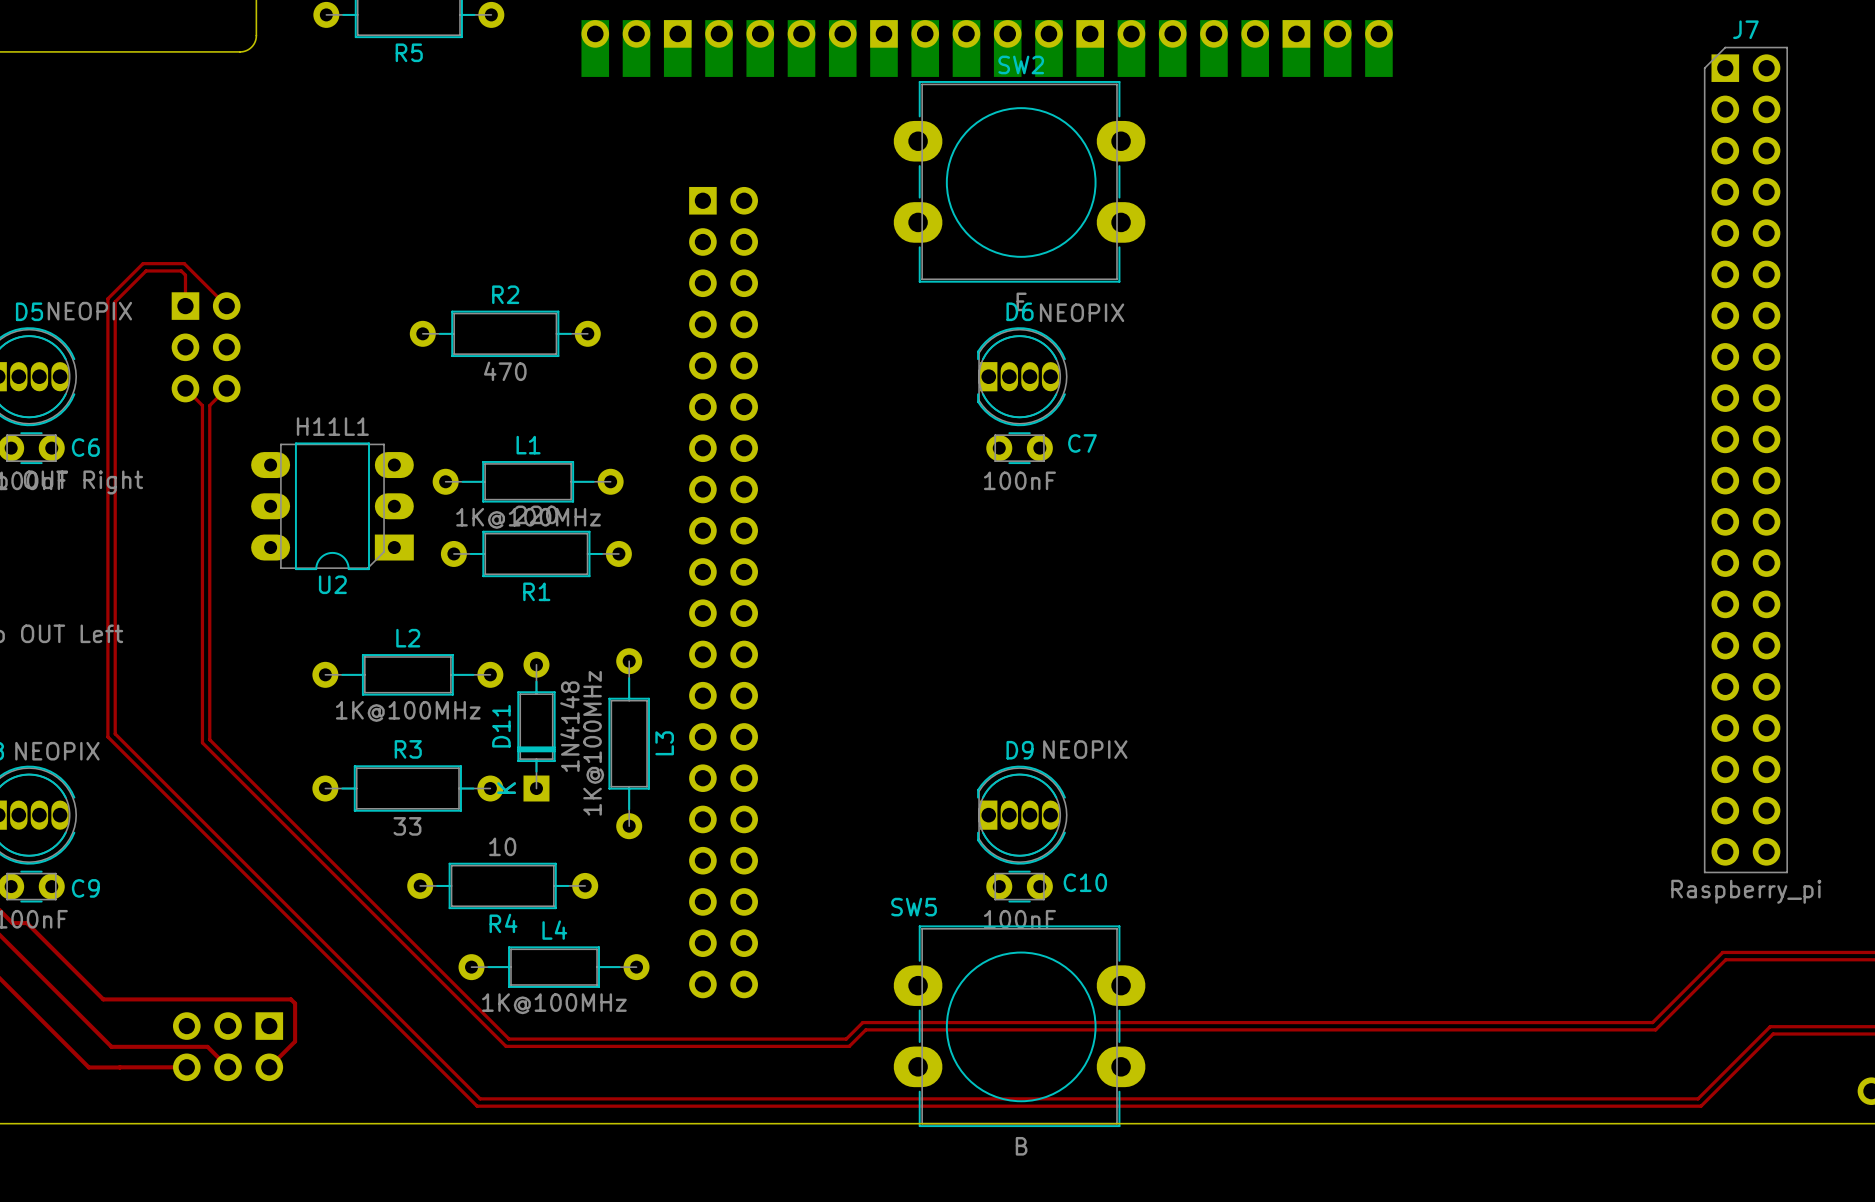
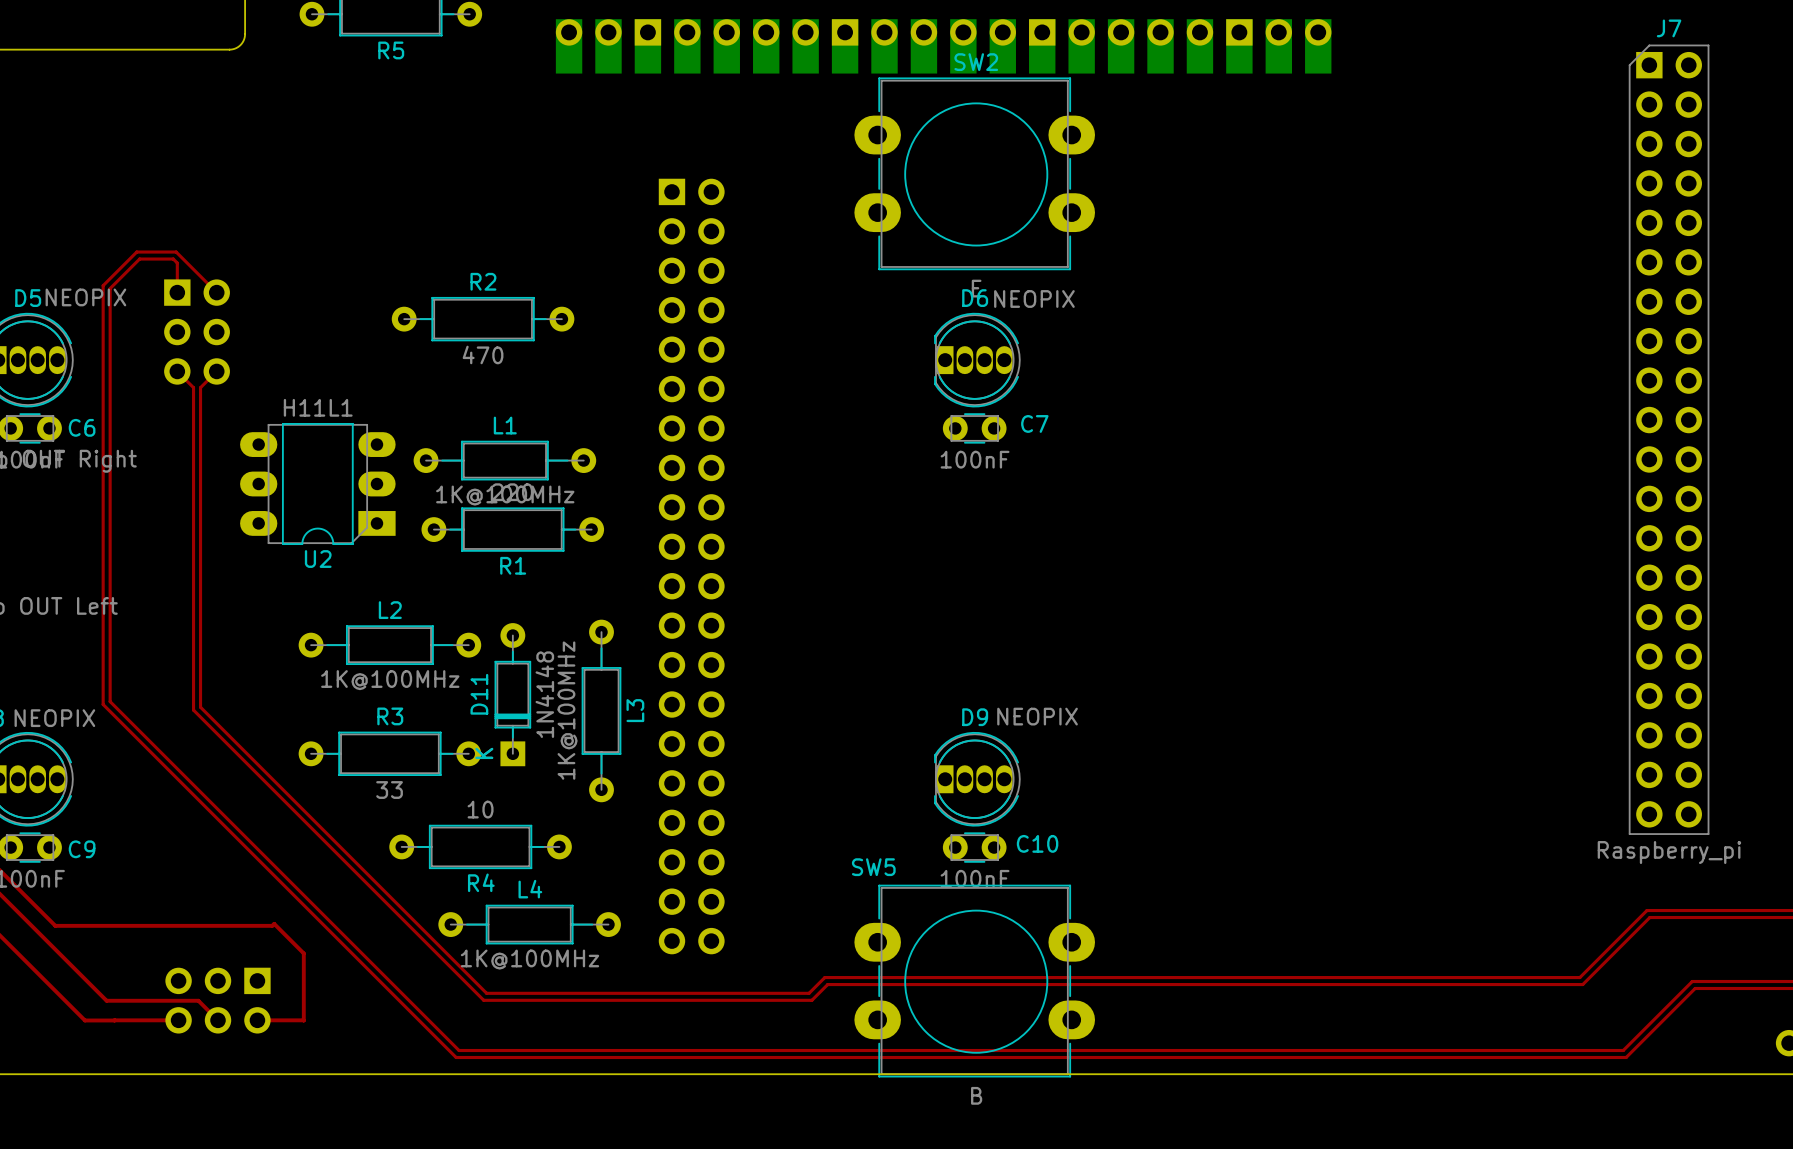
top track: (12, 923) (27, 923) (103, 999) (290, 999) (295, 1003) (295, 1041) (269, 1067) -> (12, 882) (55, 925) (272, 925) (274, 923) (303, 953) (303, 1020)
top track: none -> (257, 1020) (303, 1020)

